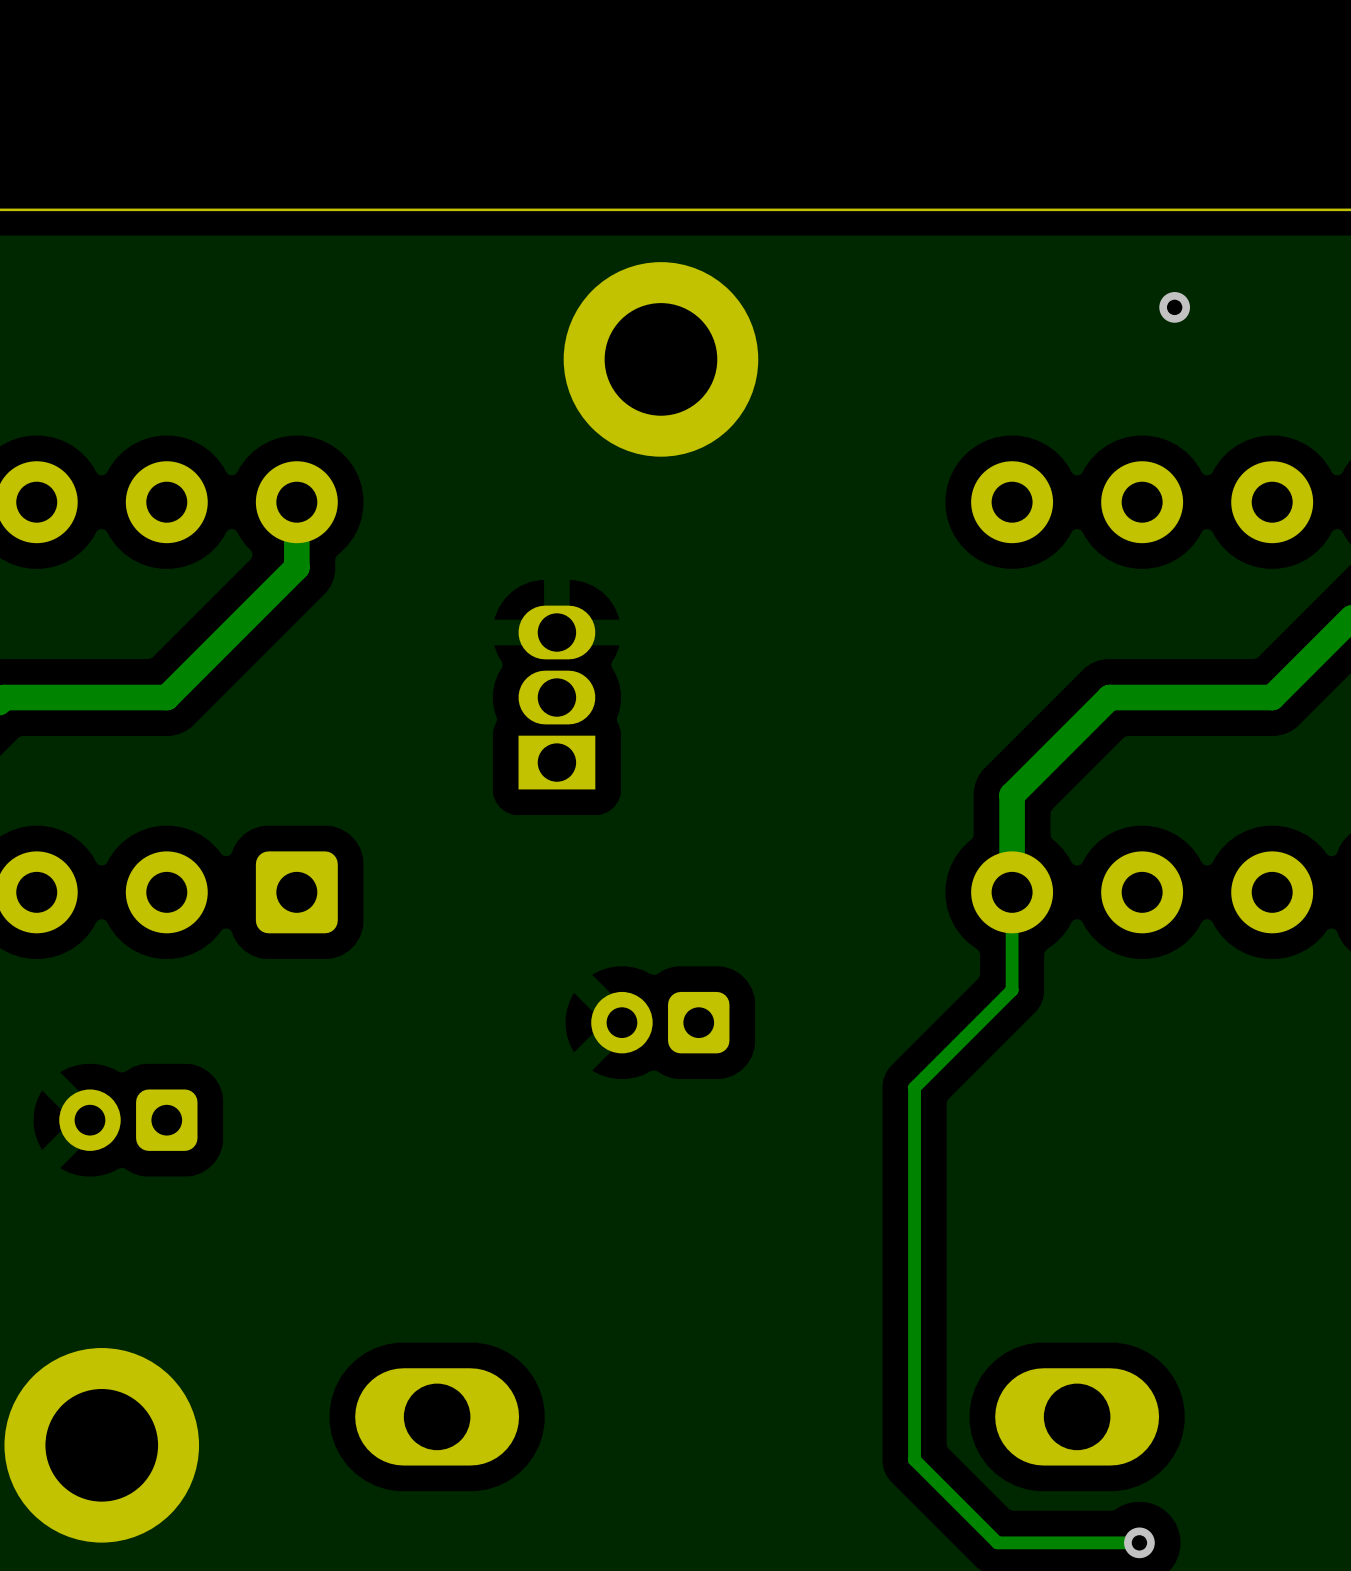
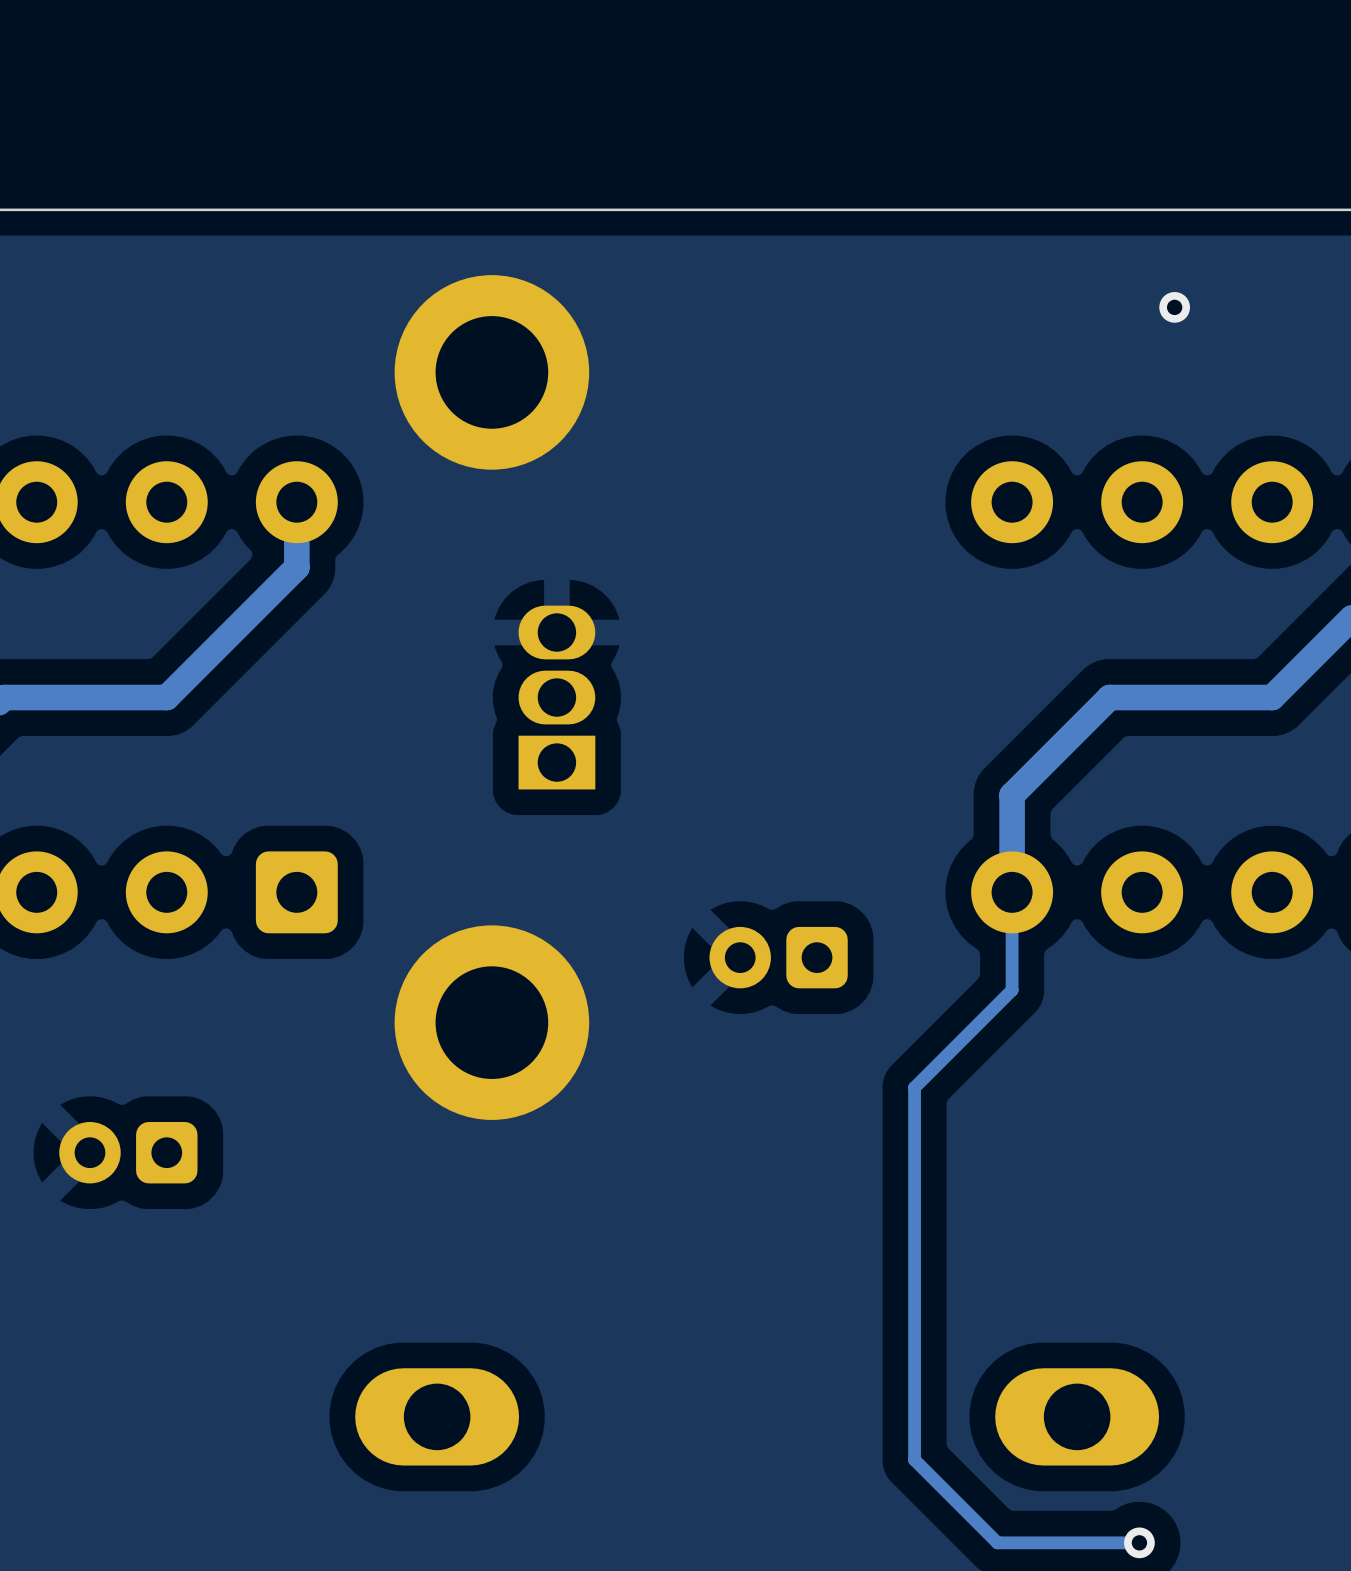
part position: (660, 359) -> (491, 372)
part: none -> (491, 1022)
part position: (660, 1022) -> (778, 957)
part position: (128, 1120) -> (128, 1152)
part: (101, 1445) -> none

